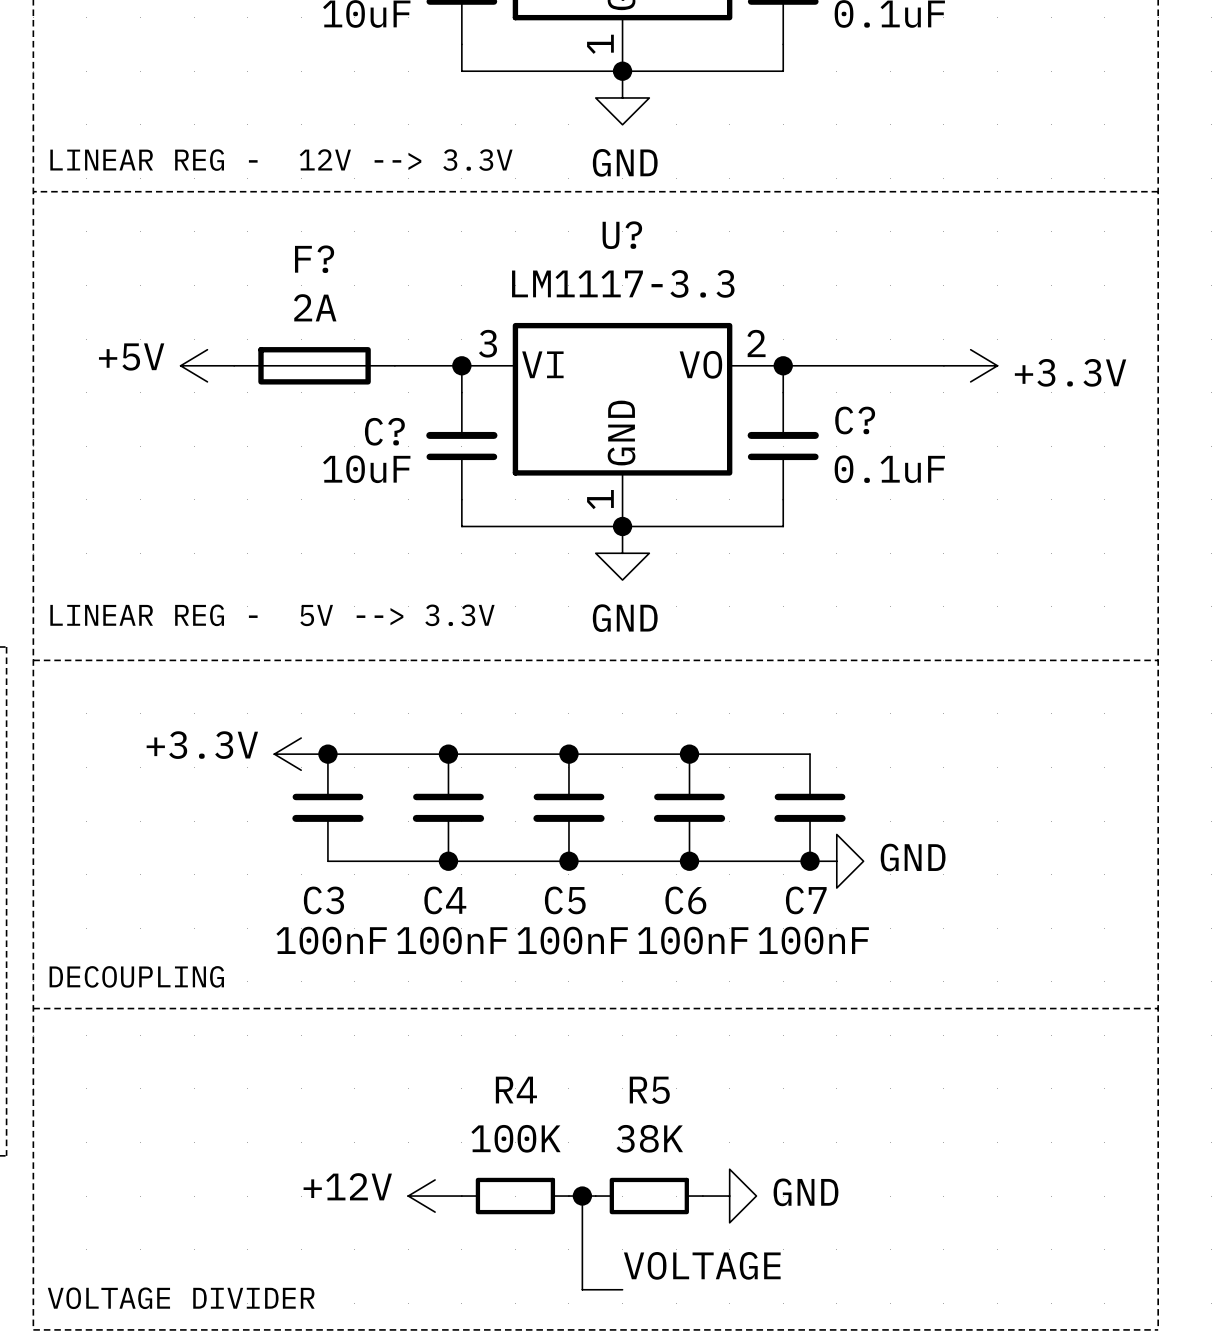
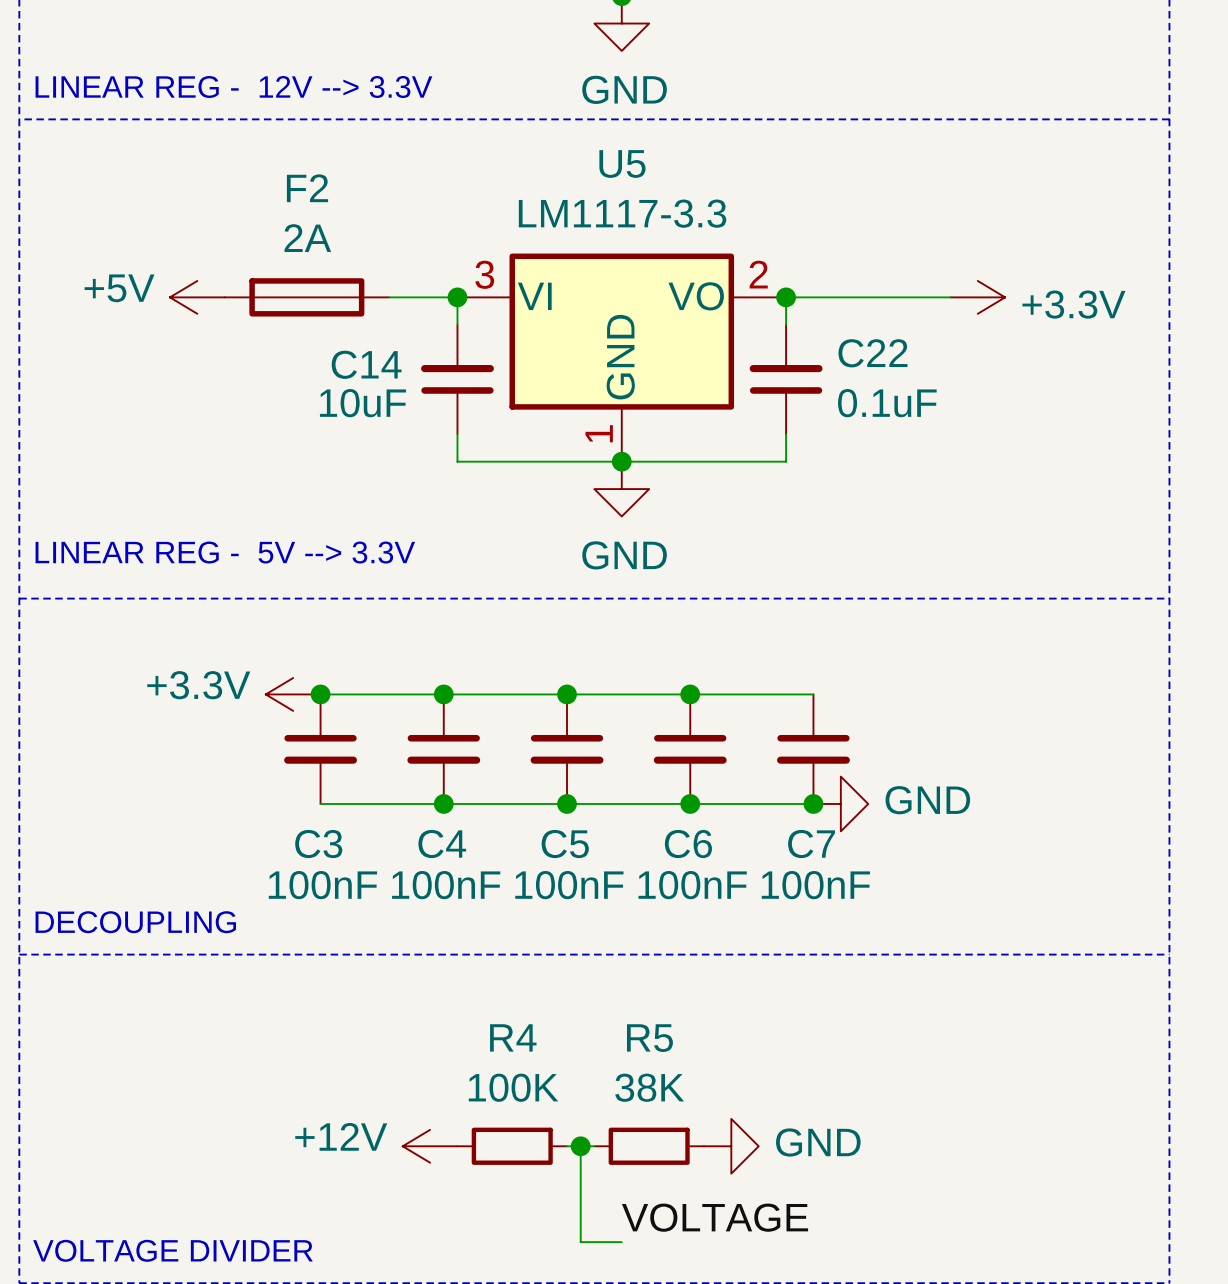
U? name: U? (622, 235) -> U5 (622, 164)
F? name: F? (314, 259) -> F2 (307, 188)
C? name: C? (855, 420) -> C22 (872, 353)
C? name: C? (384, 431) -> C14 (366, 364)

